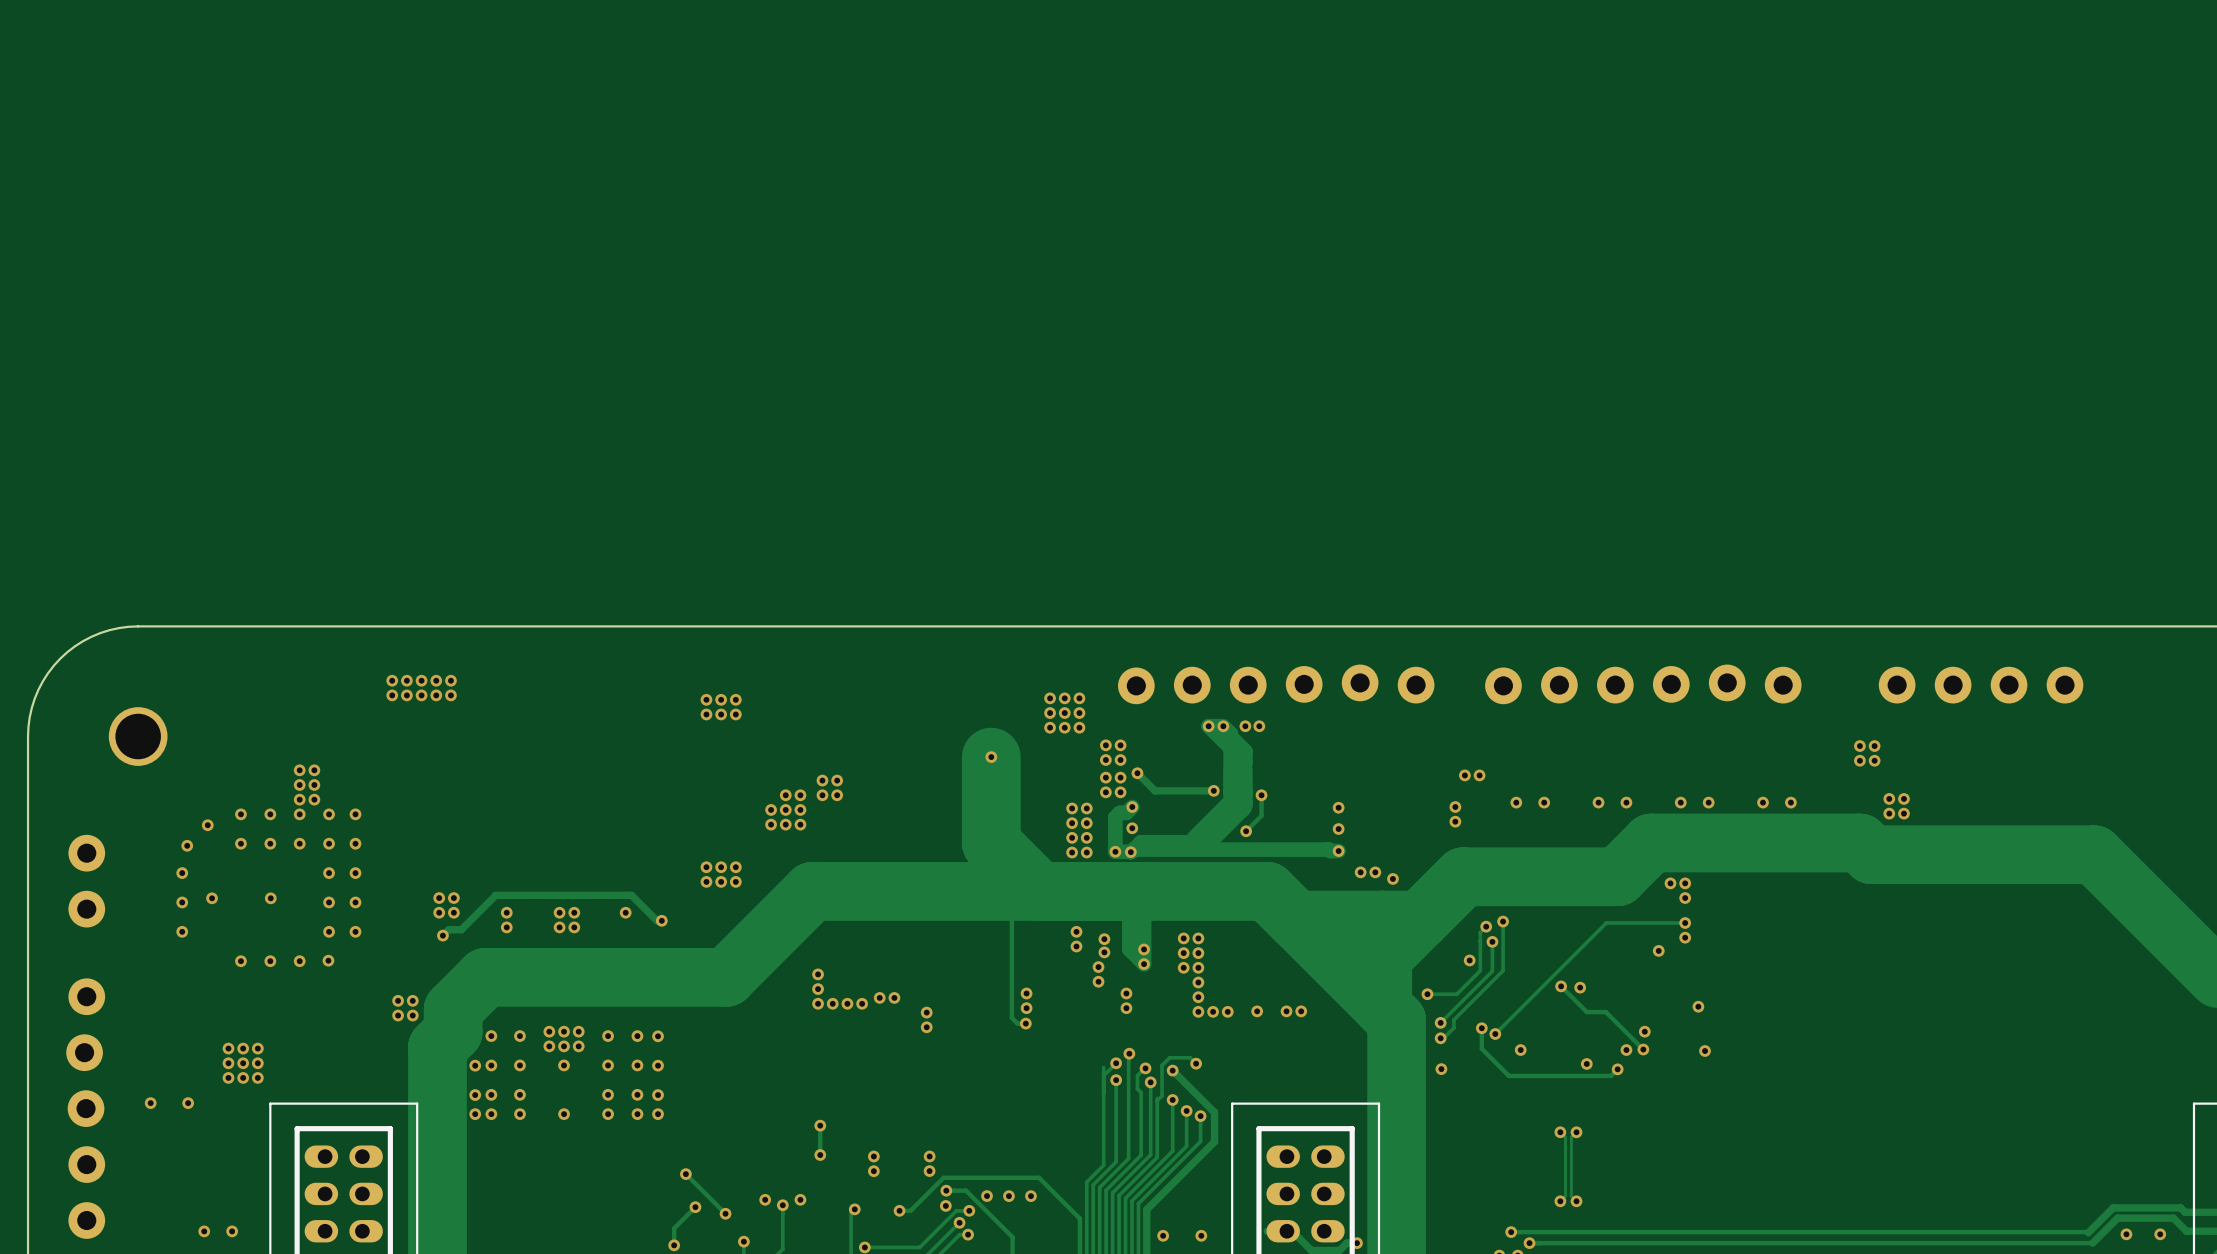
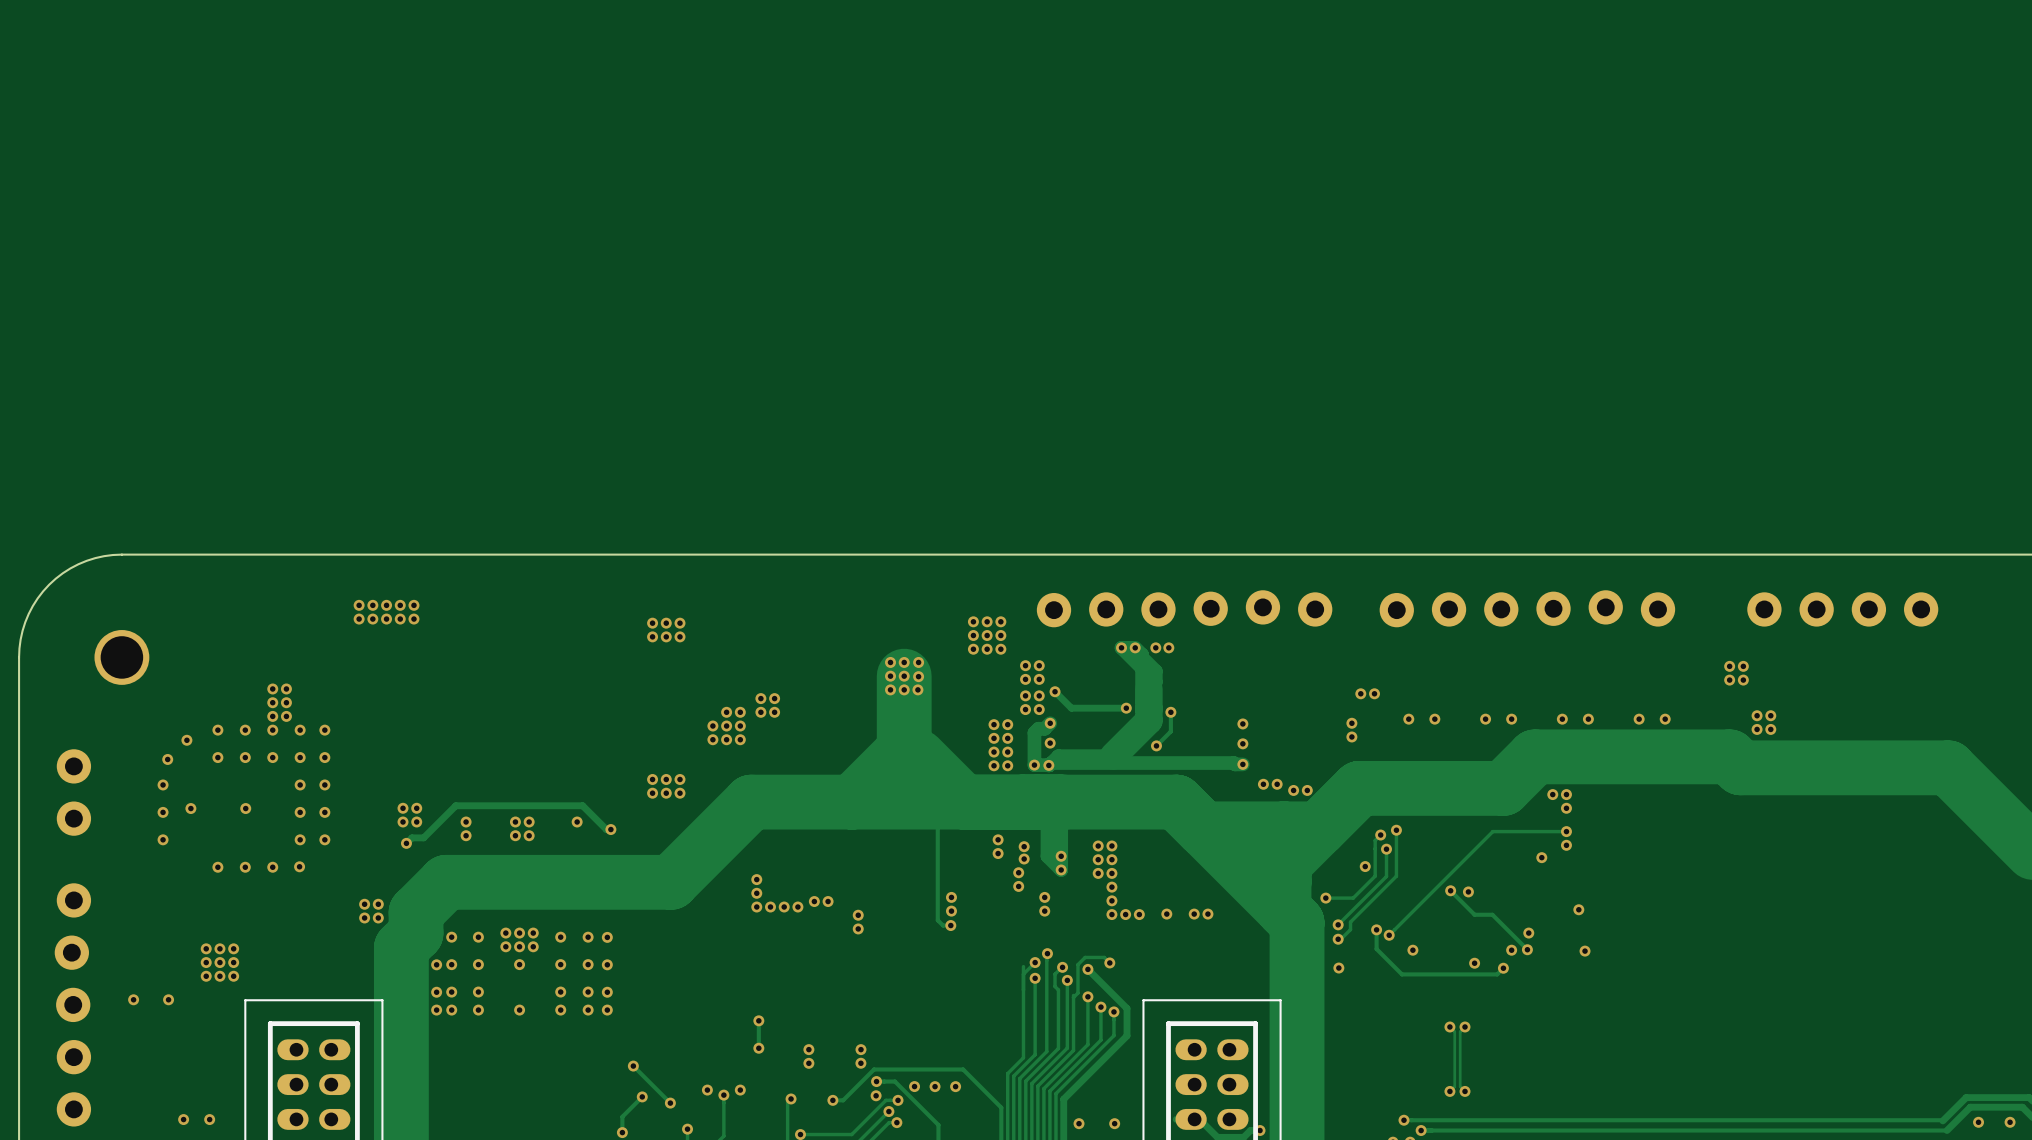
via: none -> (890, 662)
via: none -> (904, 662)
via: none -> (918, 662)
via: none -> (890, 676)
track: none -> (904, 676) (904, 750) (852, 802)
via: none -> (904, 676)
track: (991, 757) (991, 842) -> none
via: none -> (890, 689)
via: none -> (904, 689)
via: none -> (917, 689)
via: none -> (1307, 790)

